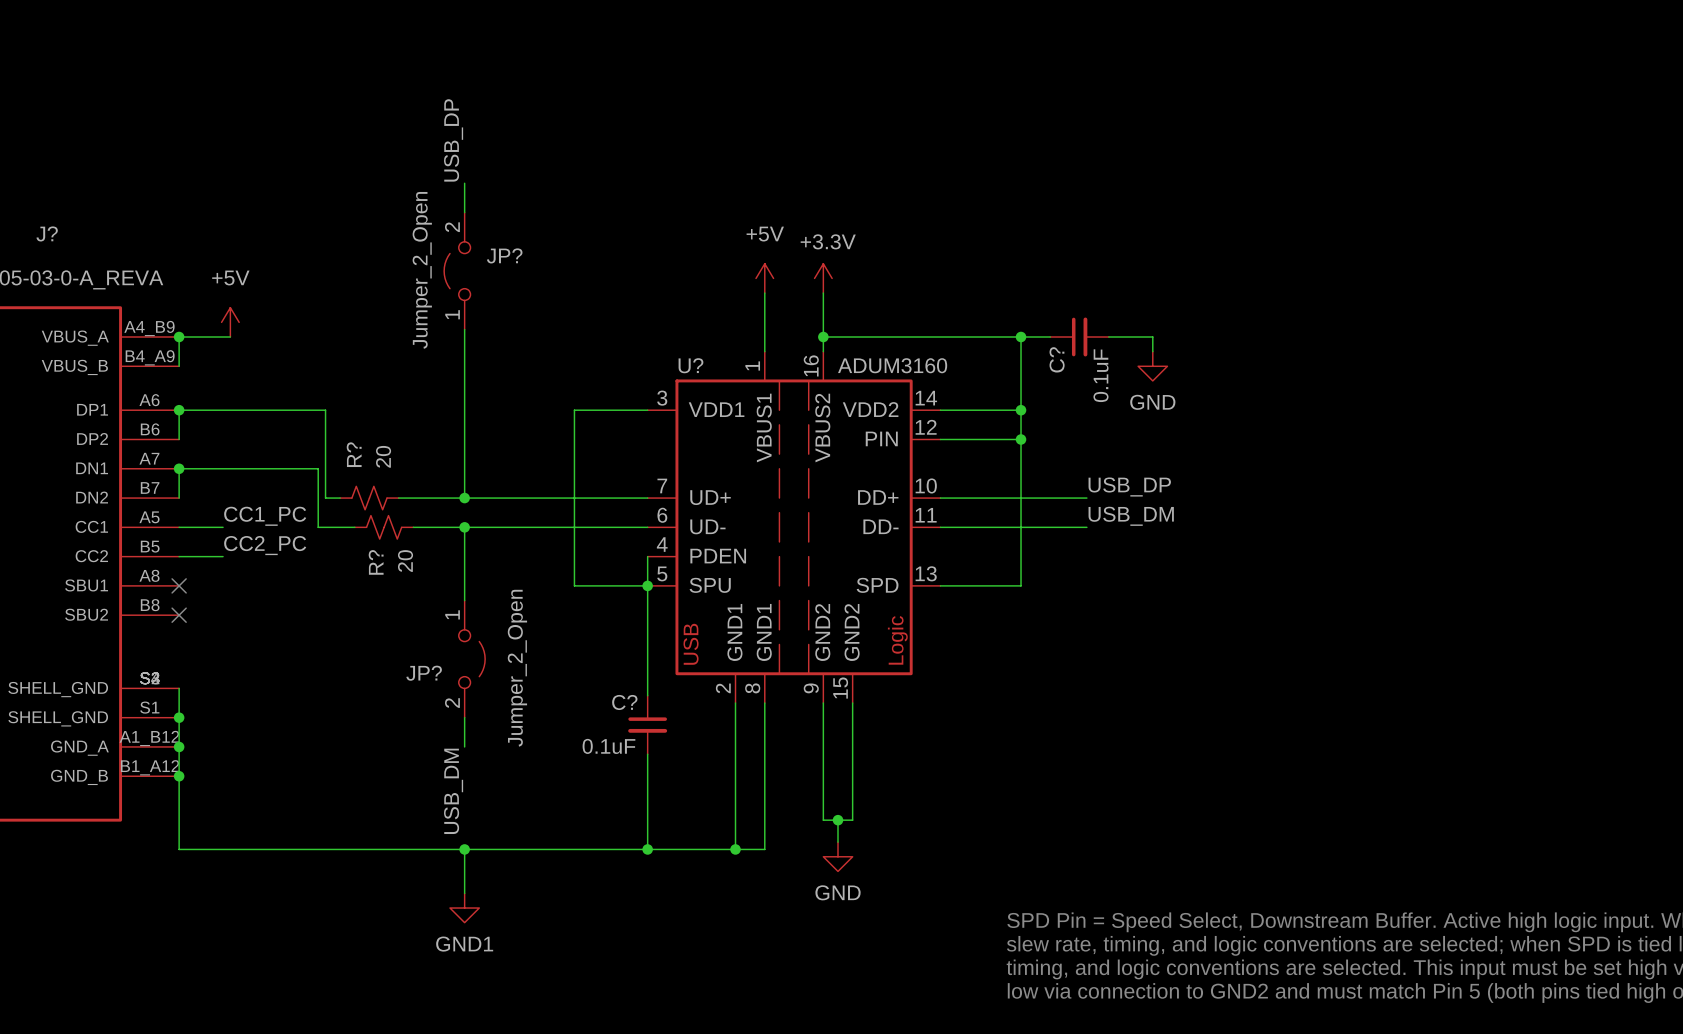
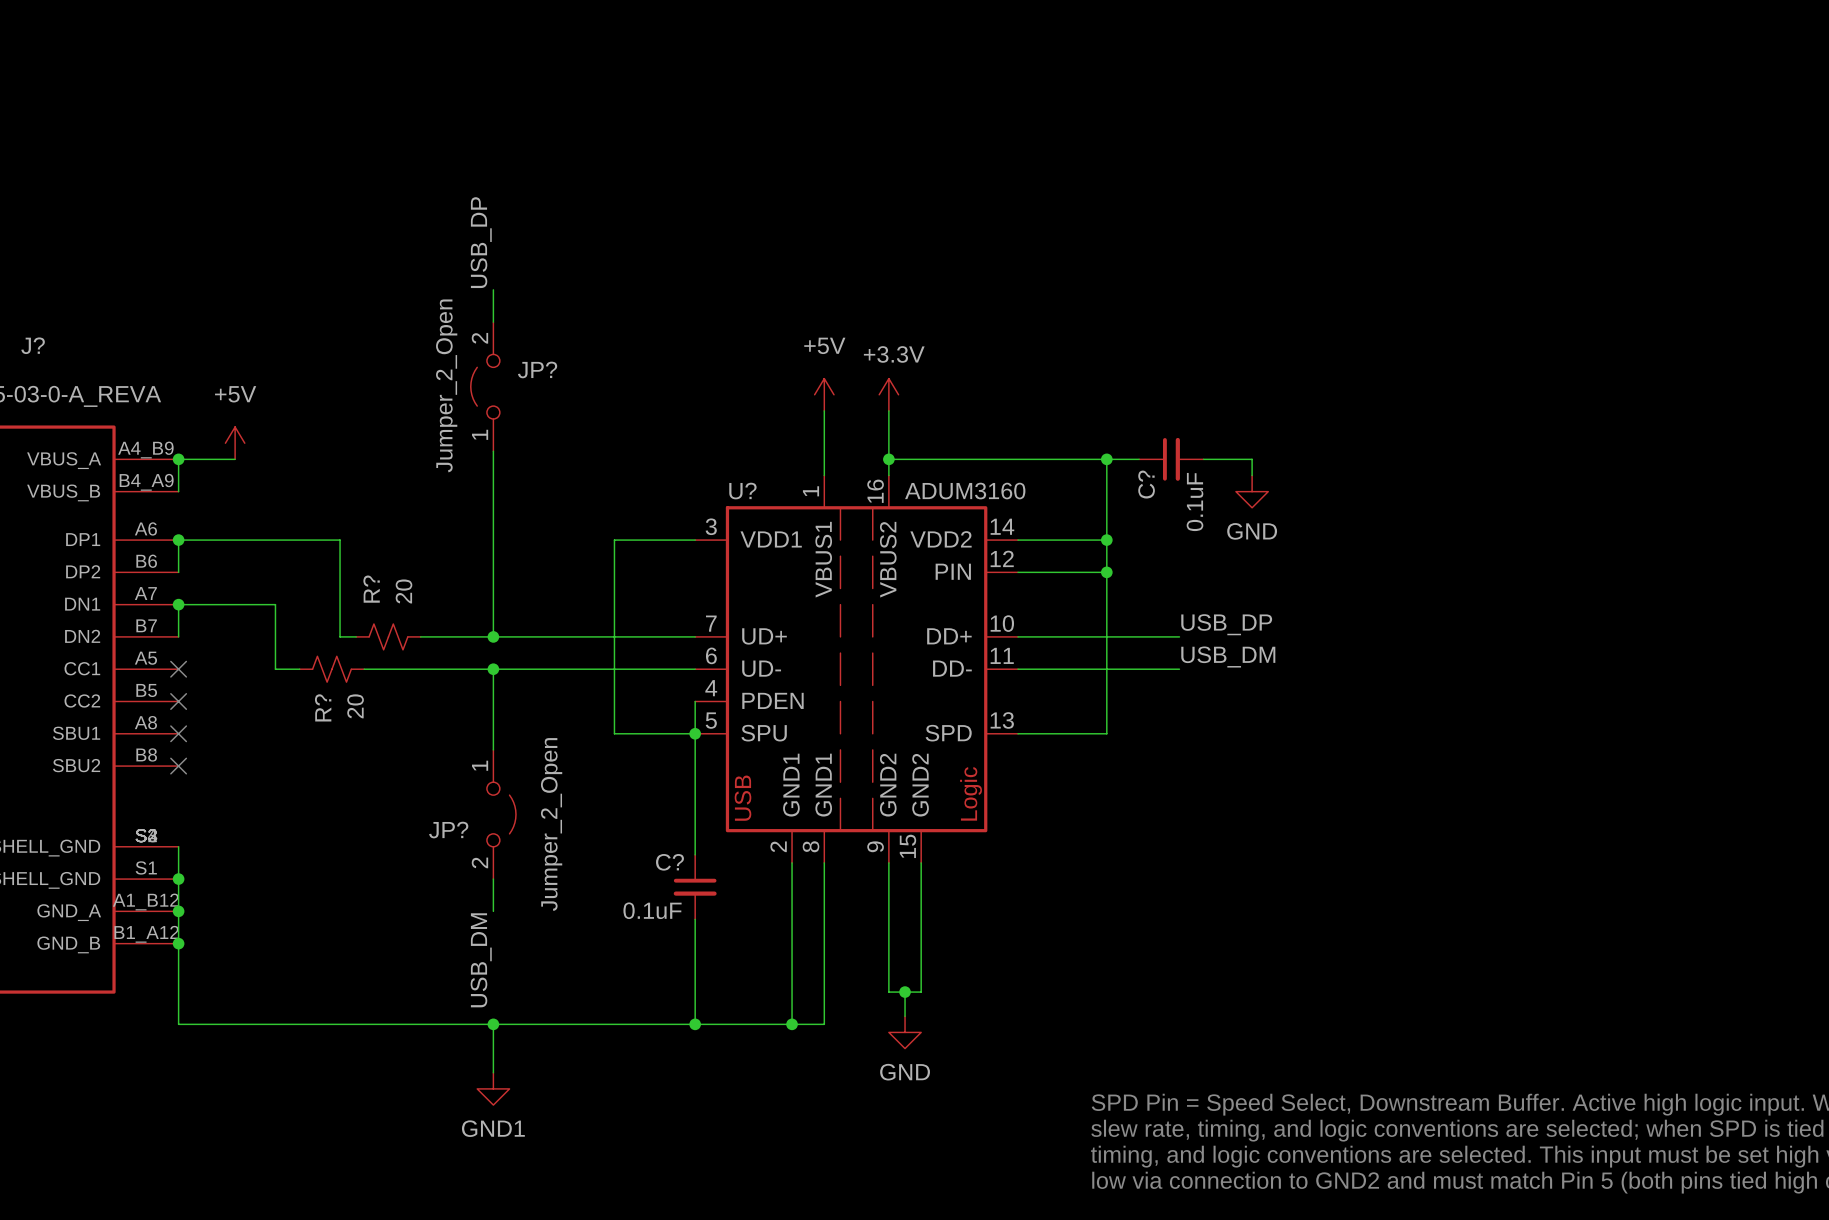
wire: (266, 468) (318, 468) (318, 527) (347, 527) -> (275, 604) (275, 669) (299, 669)
label: CC1_PC (265, 516) -> none
wire: (179, 527) (223, 527) -> none
no-connect mark: none -> (178, 669)
R? position: (384, 527) -> (331, 669)
label: CC2_PC (265, 545) -> none
wire: (179, 556) (223, 556) -> none
no-connect mark: none -> (178, 701)

